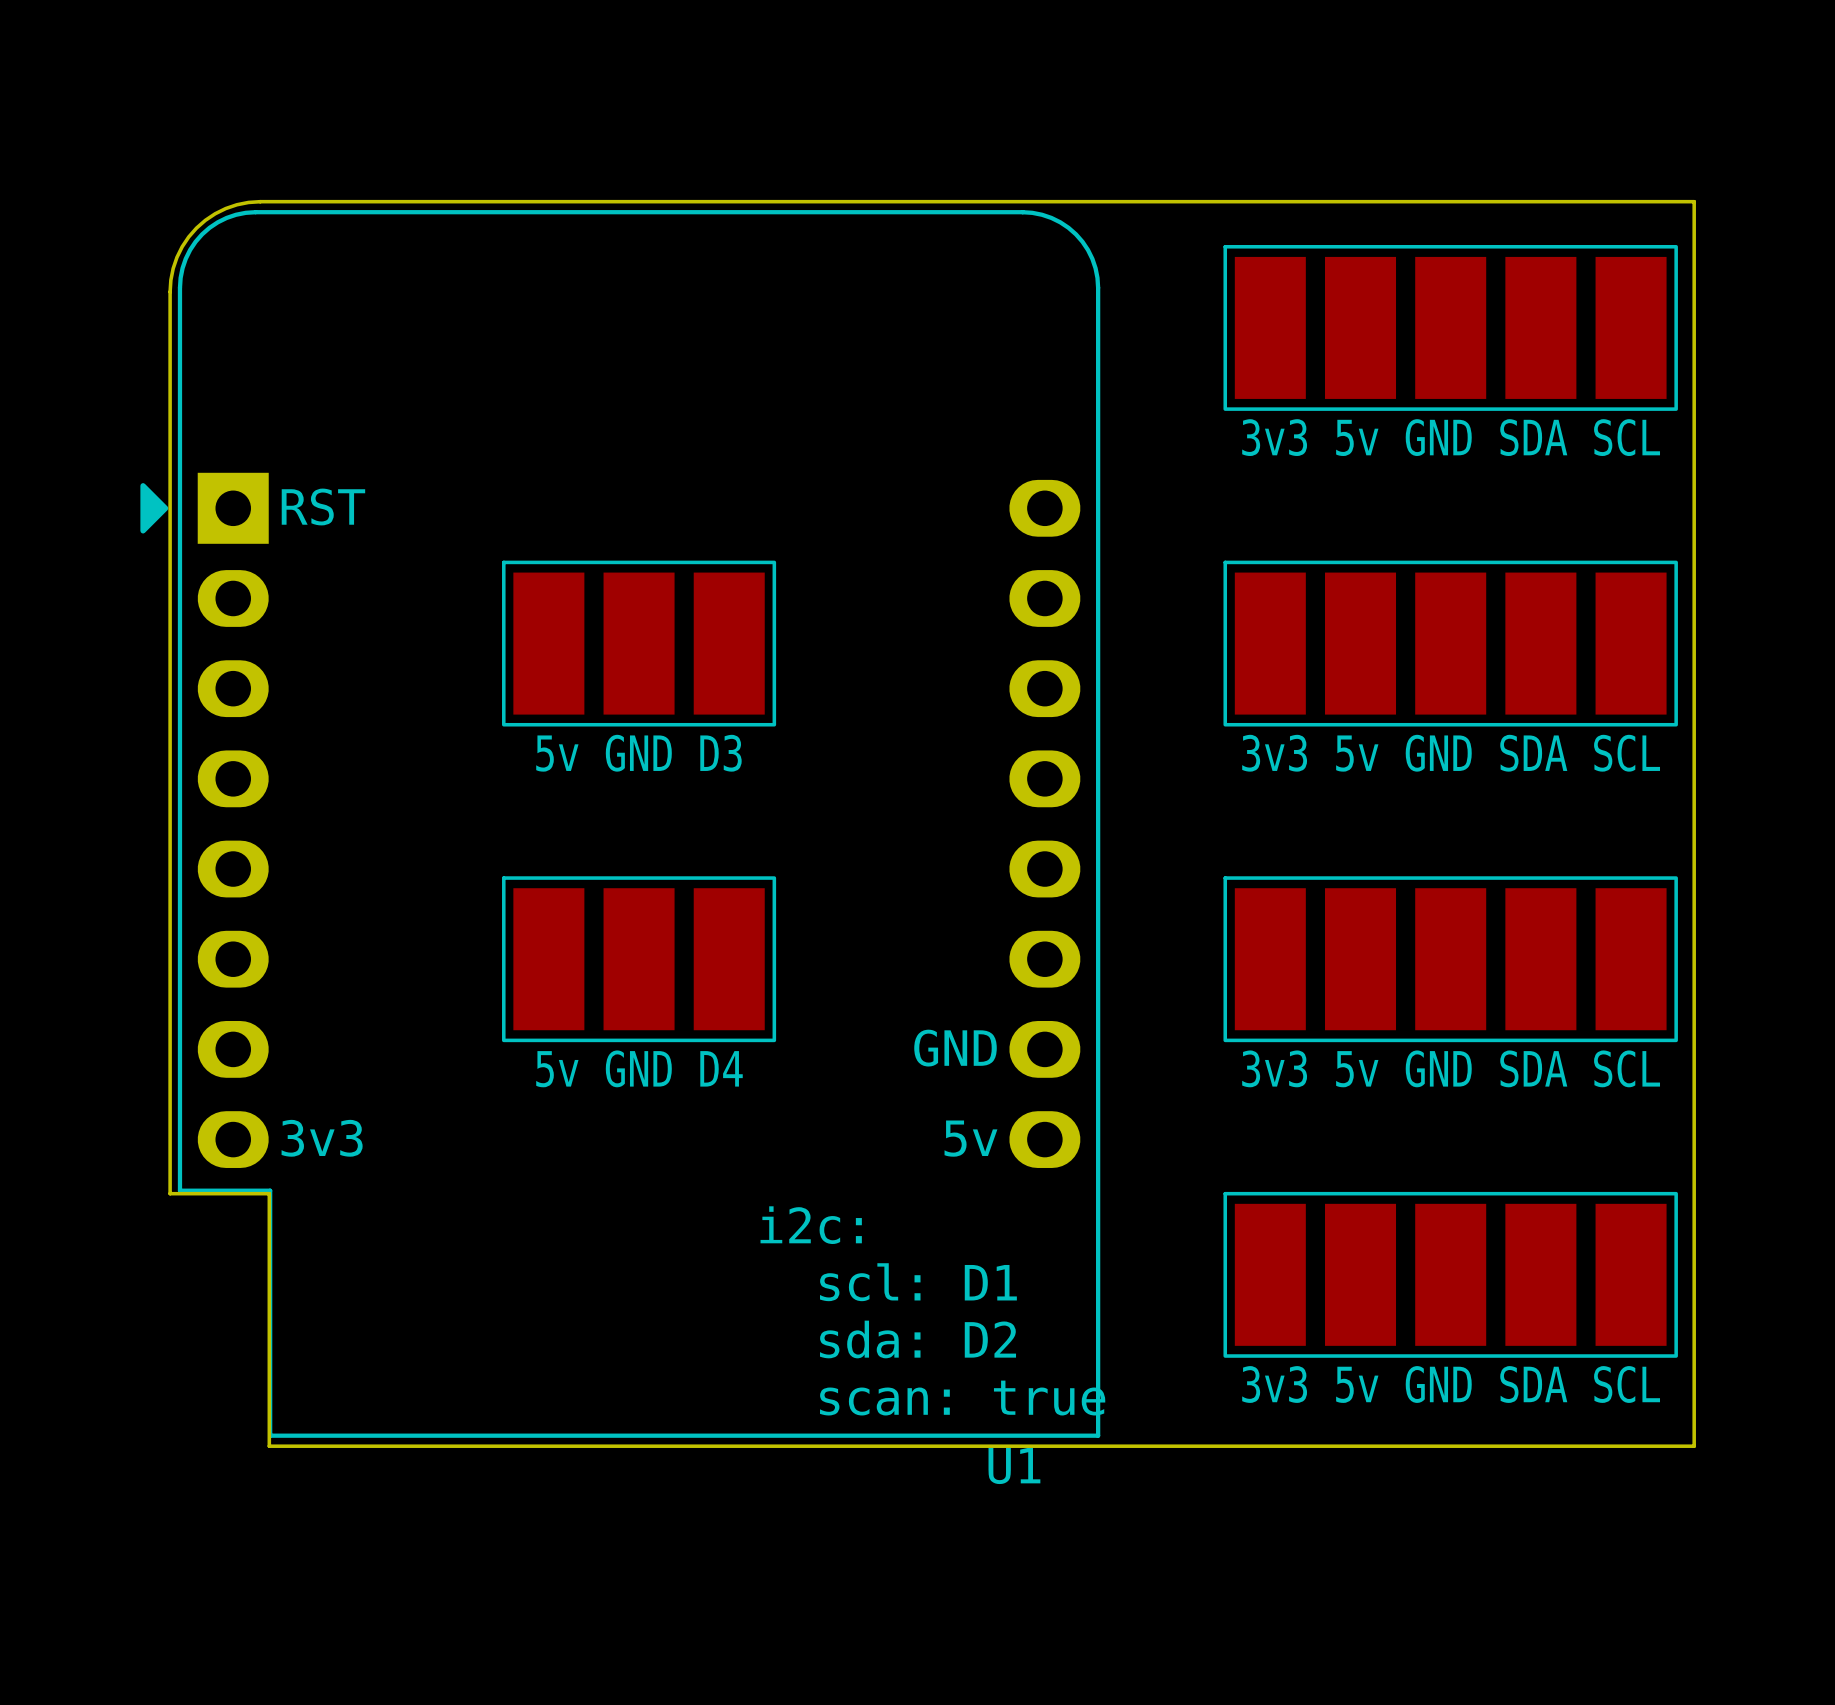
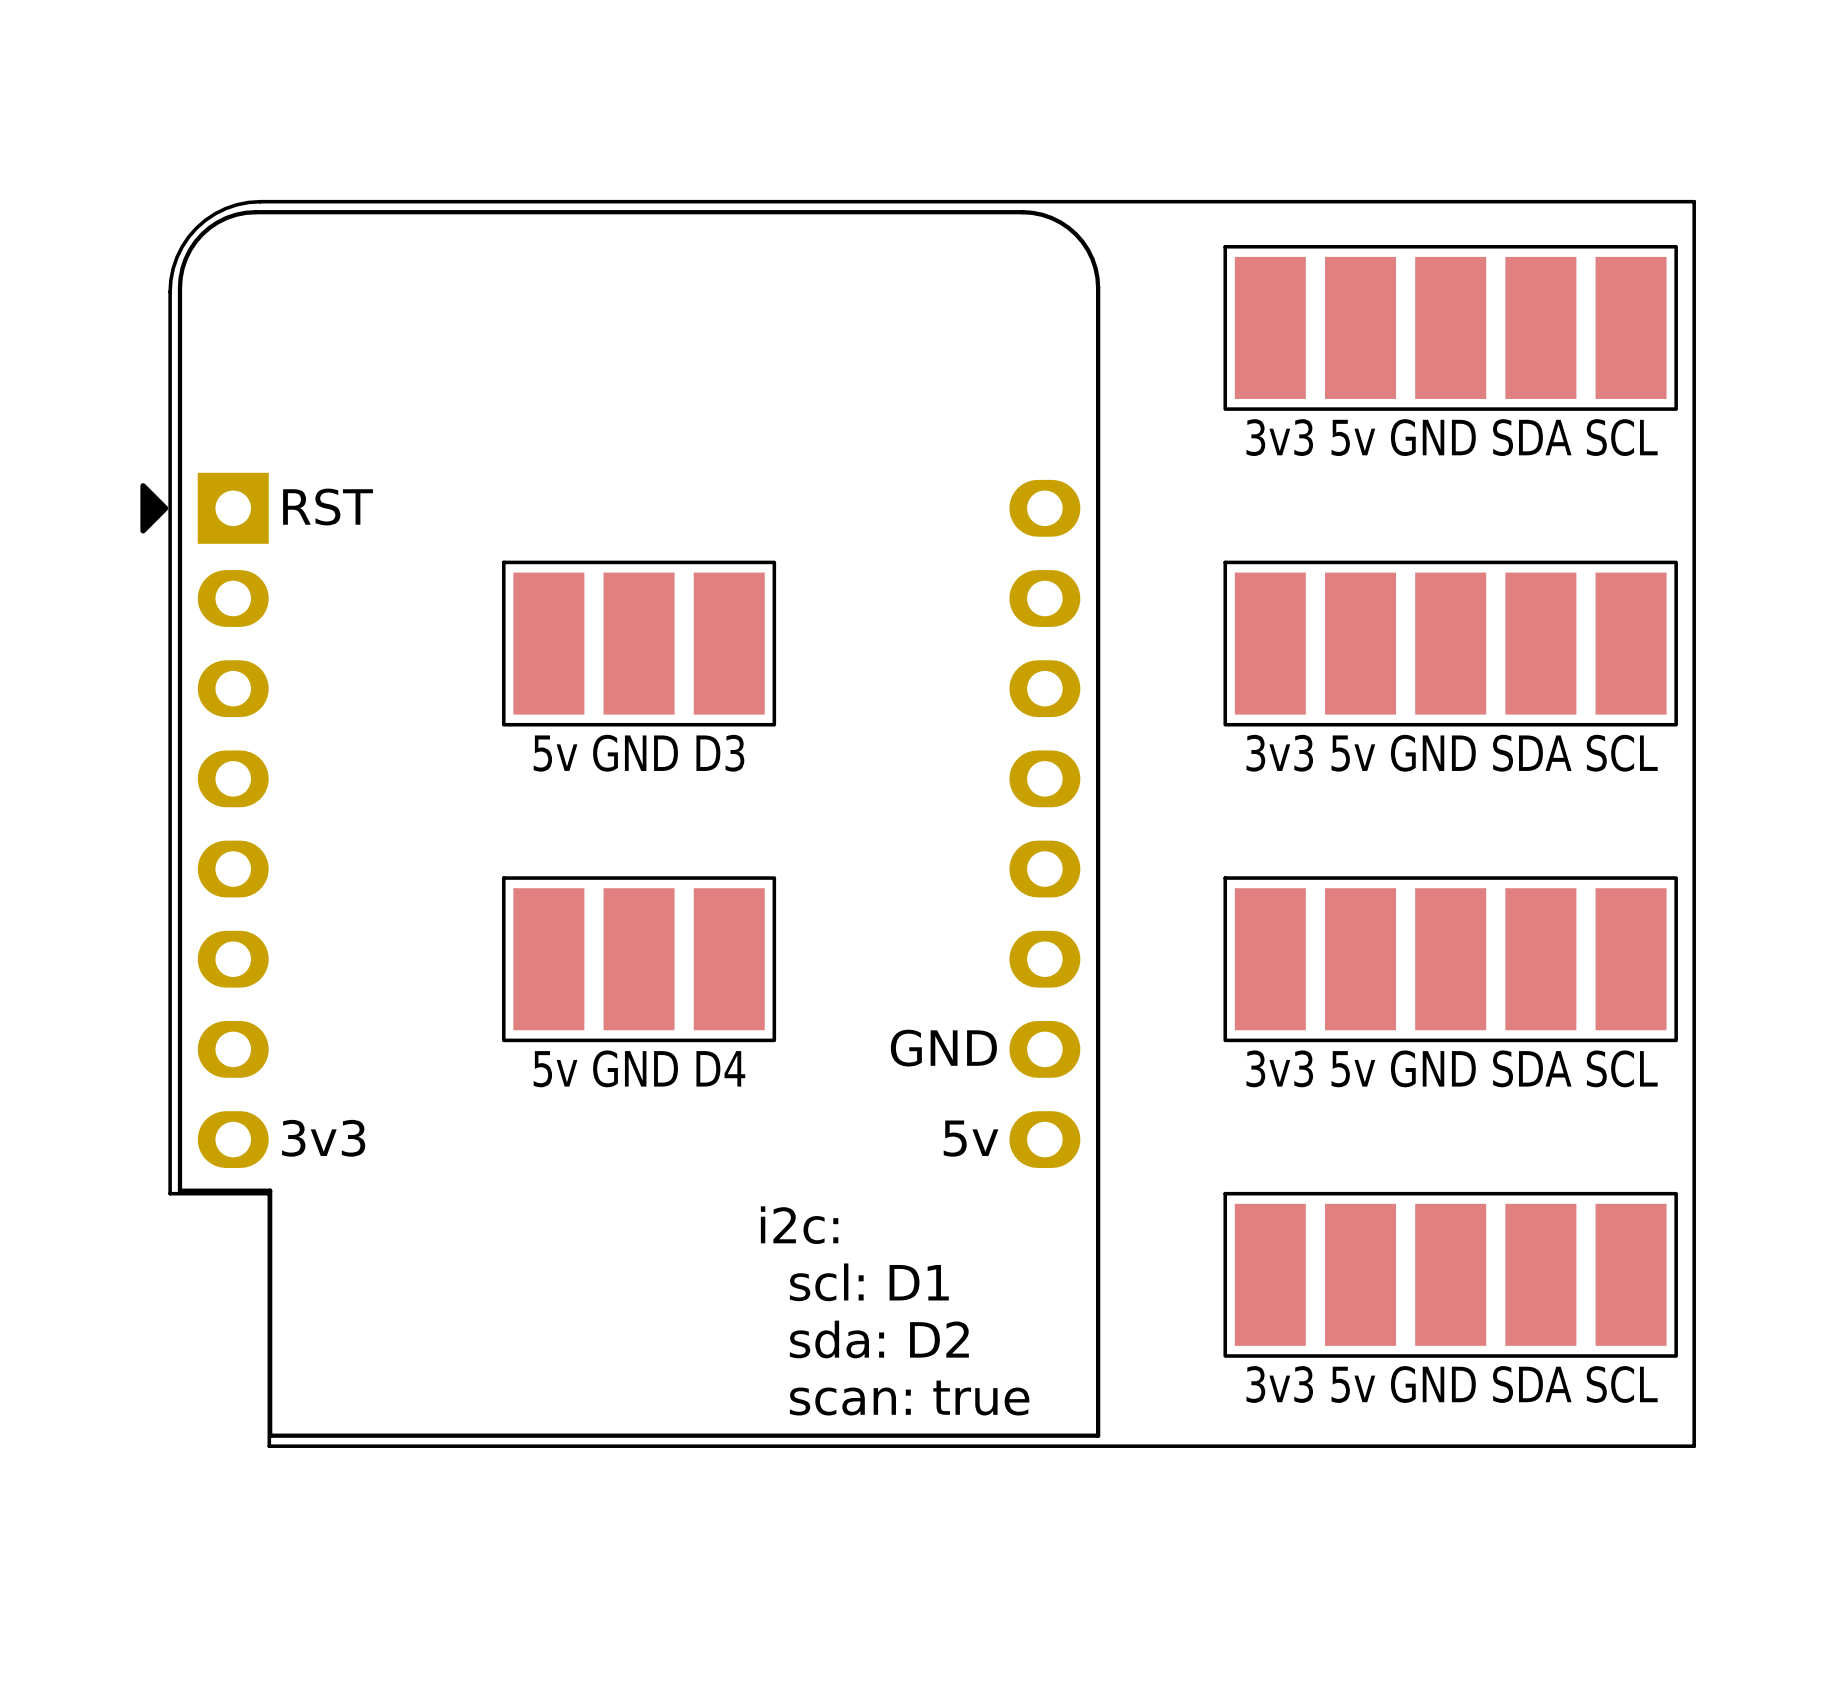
U1 name: U1 (1014, 1465) -> none

